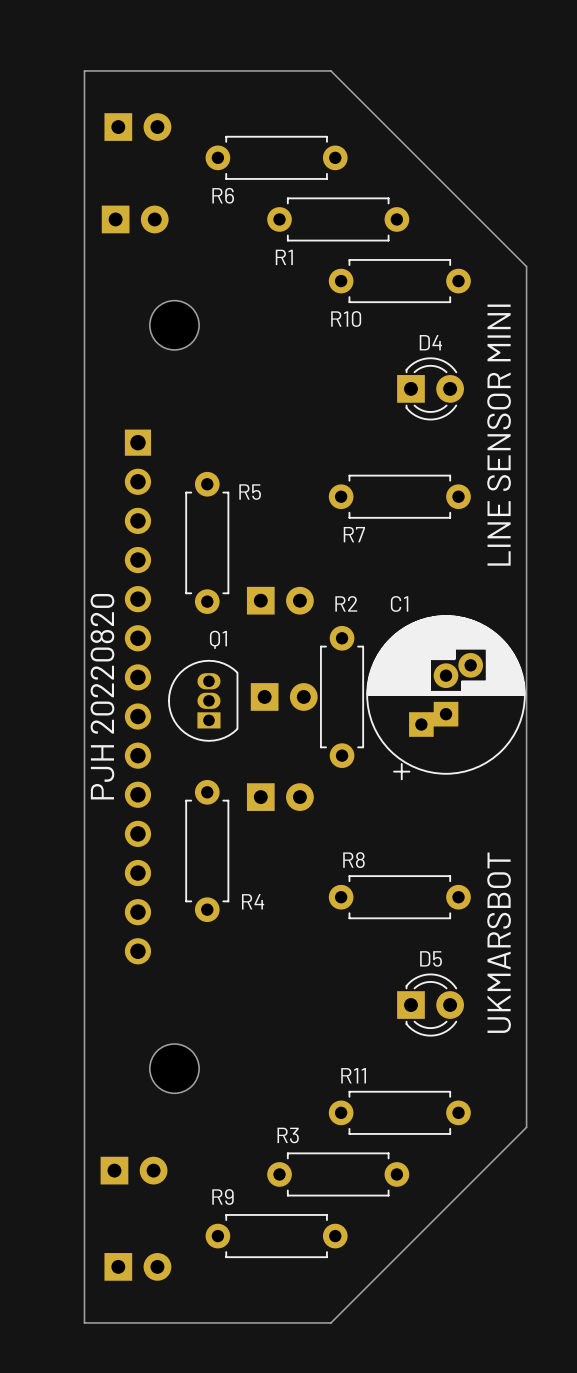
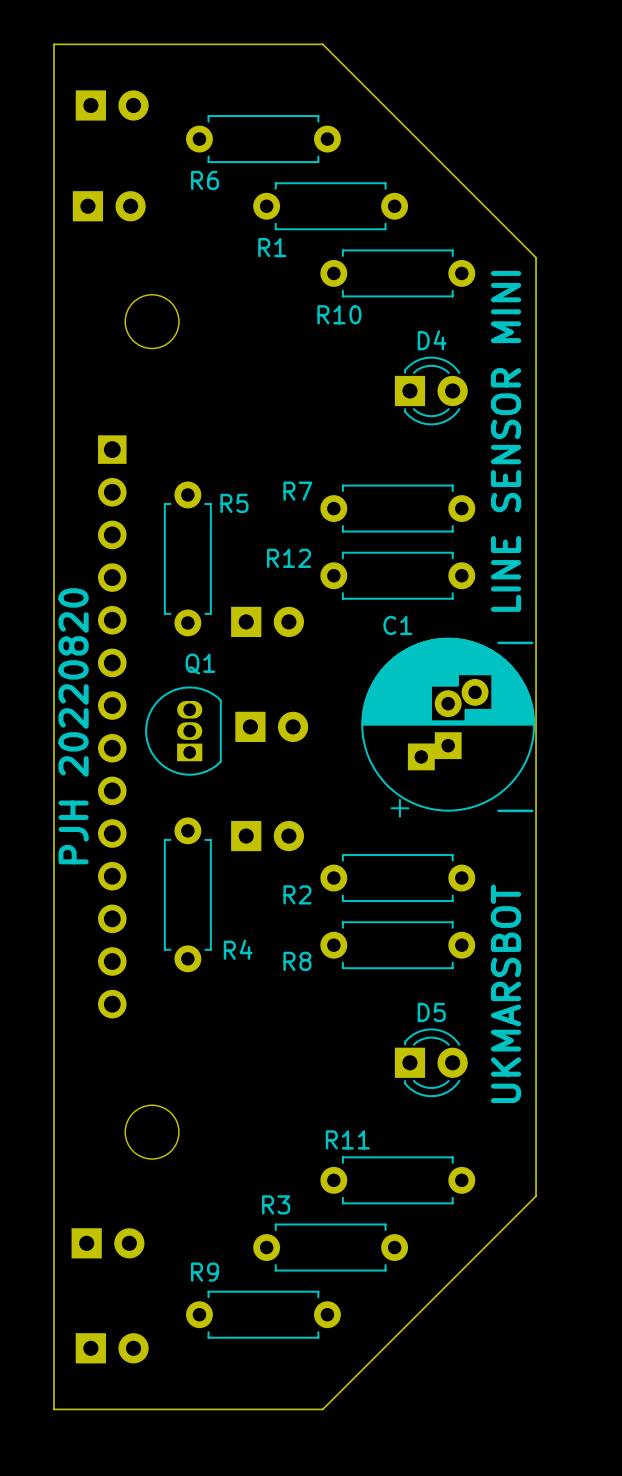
R7 name position: R7 (354, 534) -> R7 (297, 491)
R12: none -> (397, 575)
R2 name position: R2 (346, 603) -> R2 (297, 894)
line: none -> (498, 642) (532, 642)
R2 rotation: 0° (342, 696) -> 90° clockwise (397, 878)
R2 position: (342, 696) -> (397, 878)
line: none -> (498, 810) (532, 810)
R8 name position: R8 (353, 860) -> R8 (297, 961)

